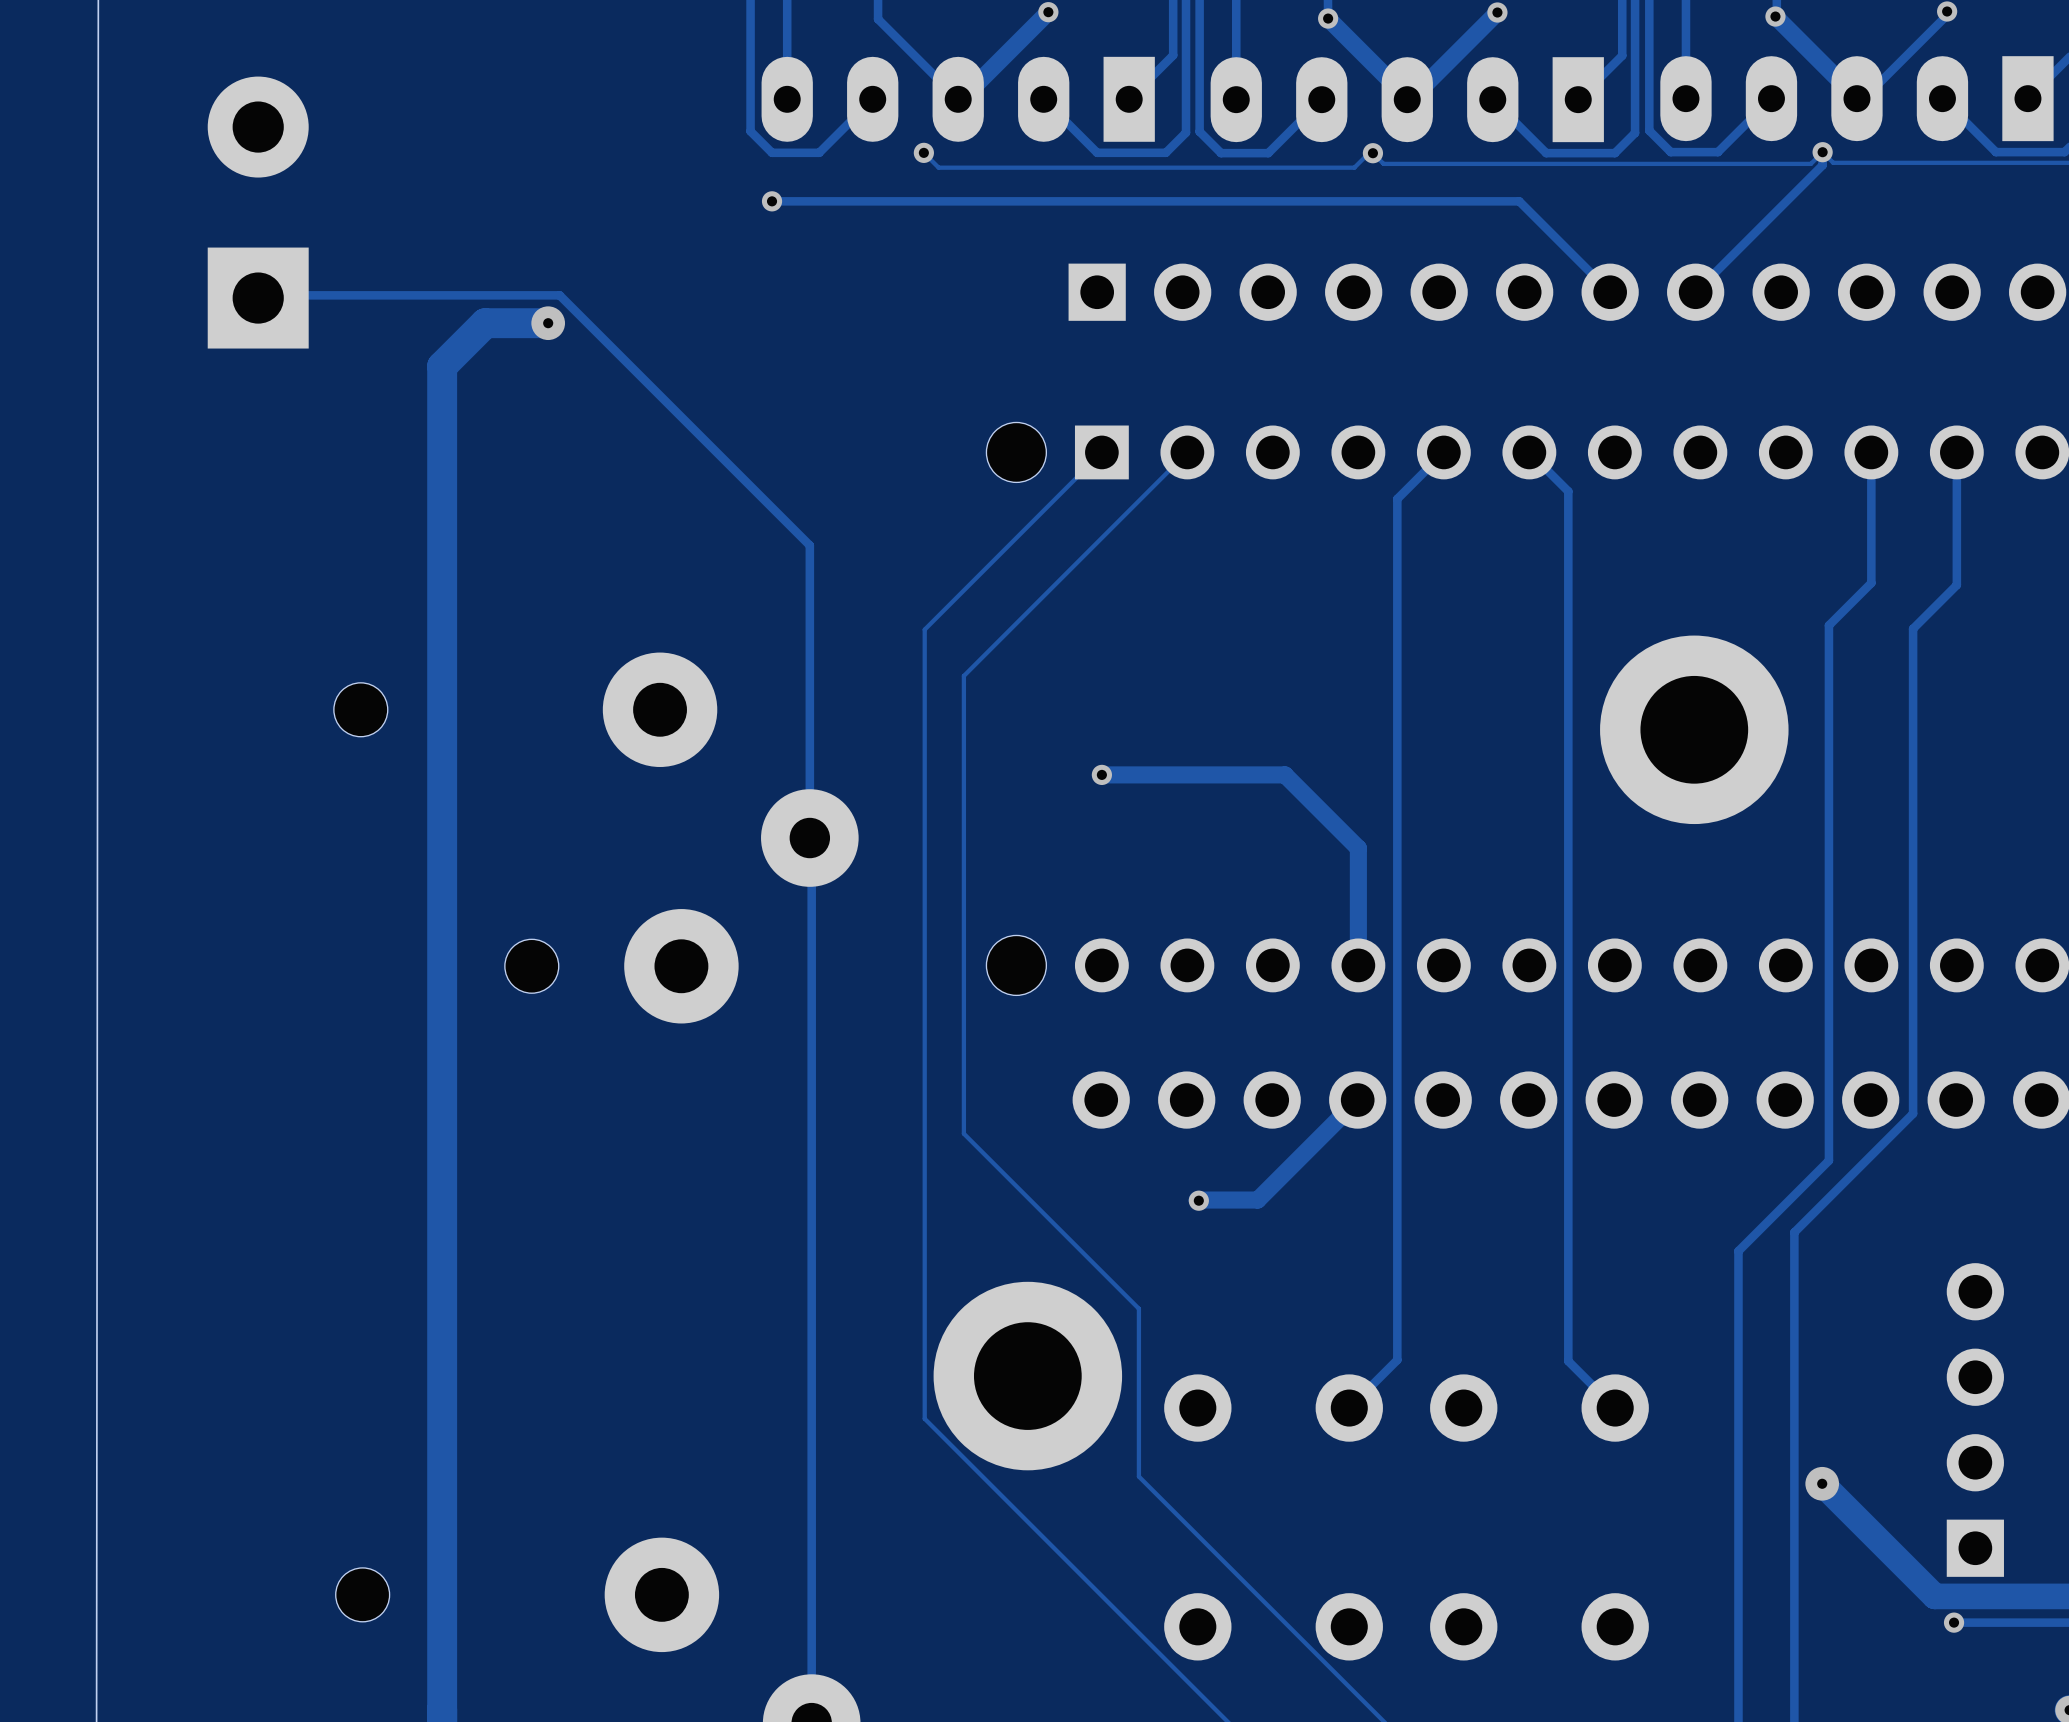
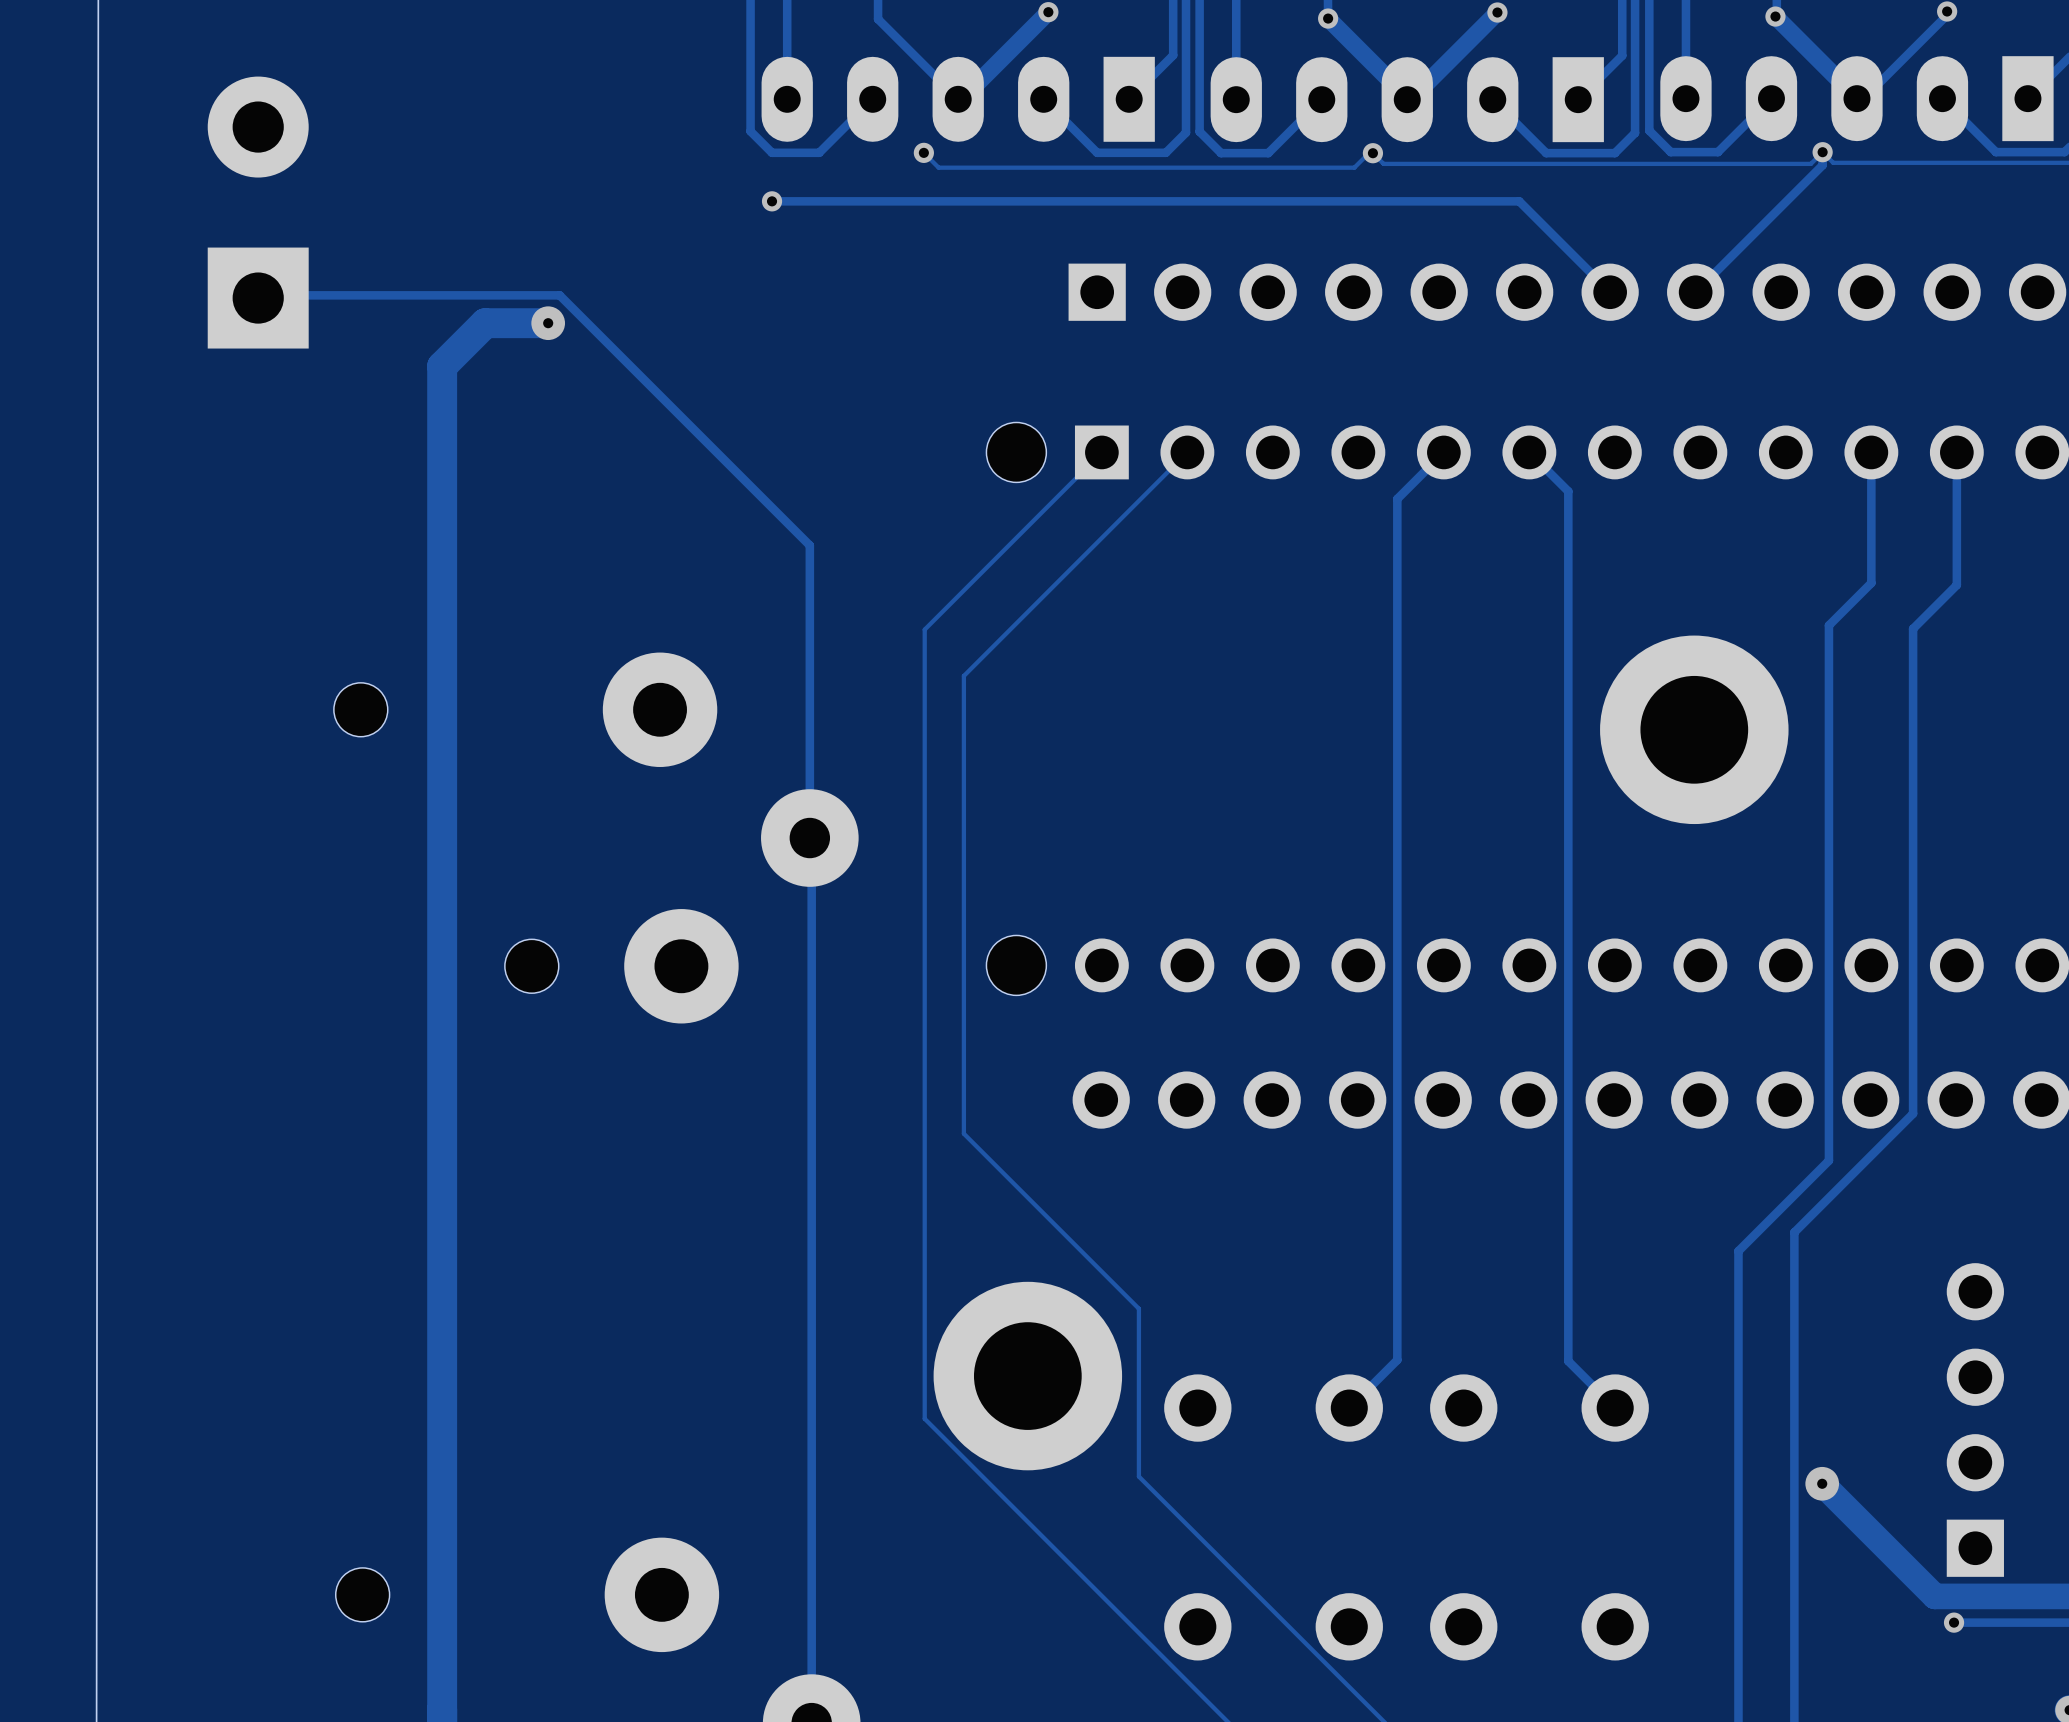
track: (1101, 774) (1285, 774) (1358, 848) (1358, 965) -> none
via: (1101, 774) -> none
track: (1357, 1100) (1257, 1200) (1197, 1200) -> none
via: (1198, 1200) -> none

